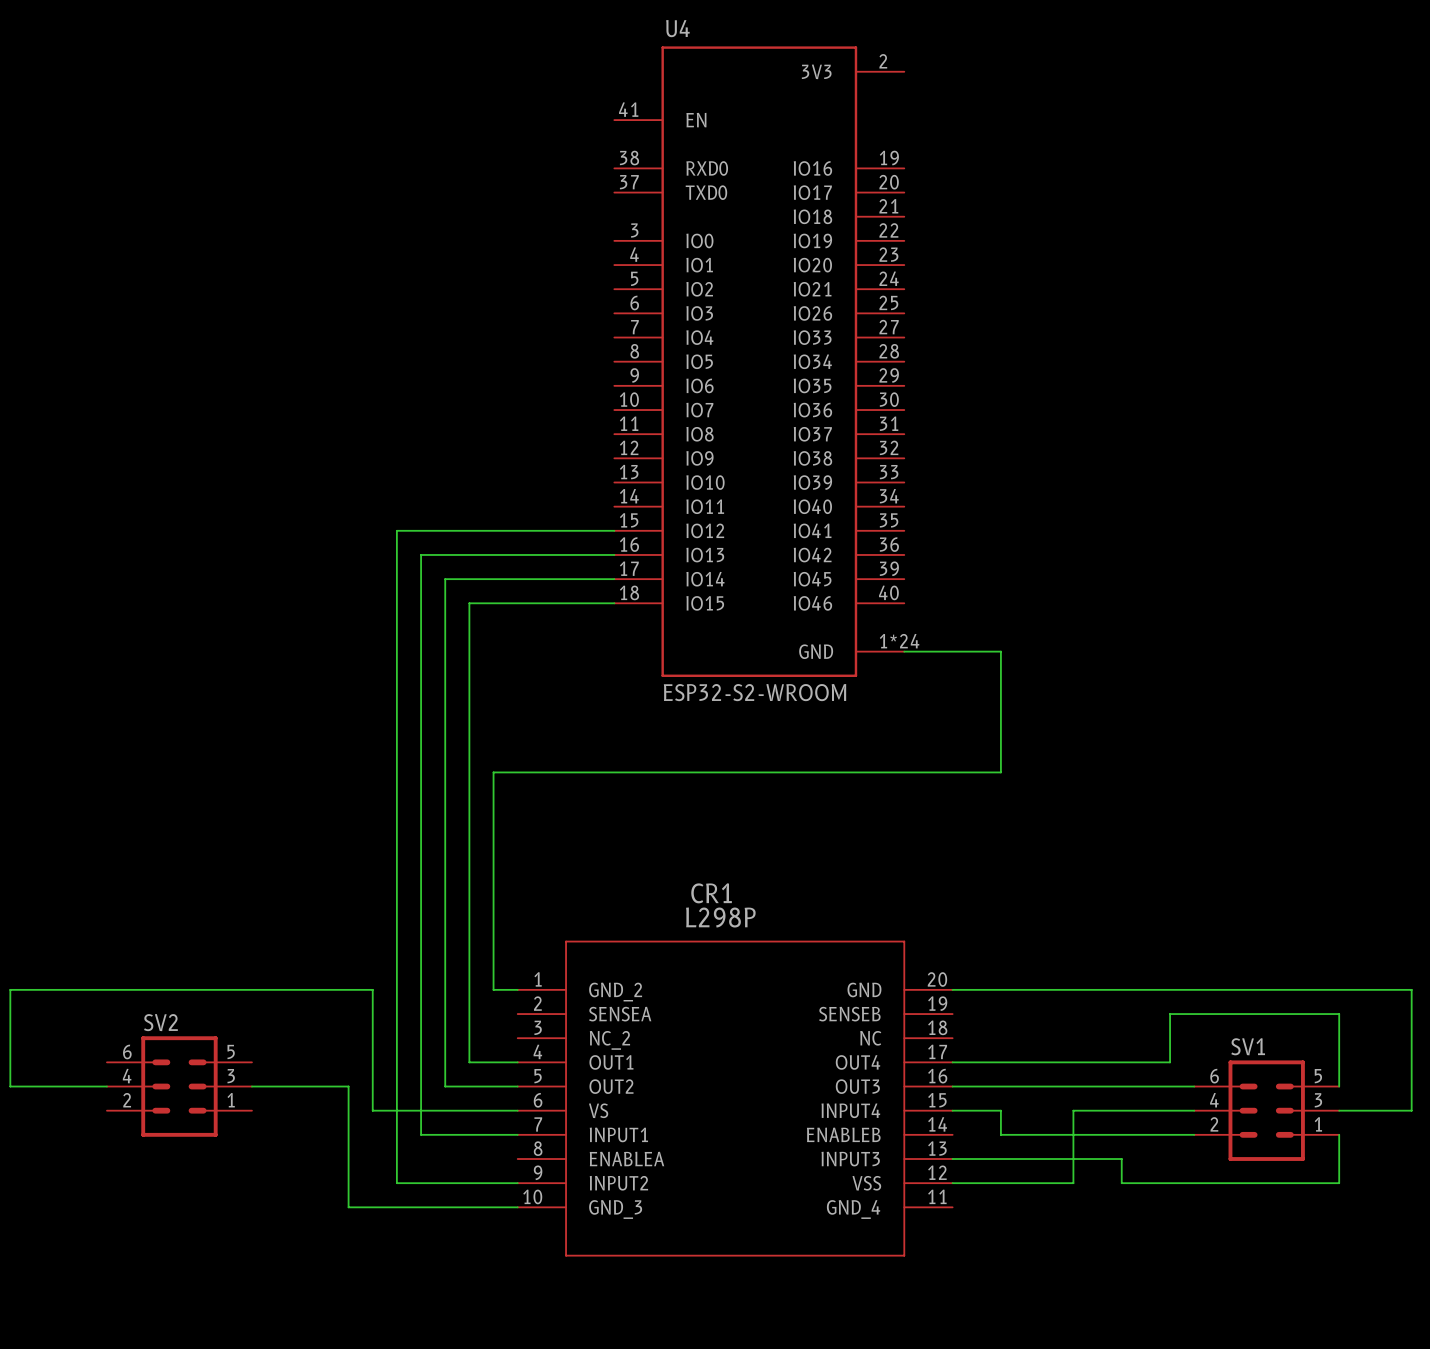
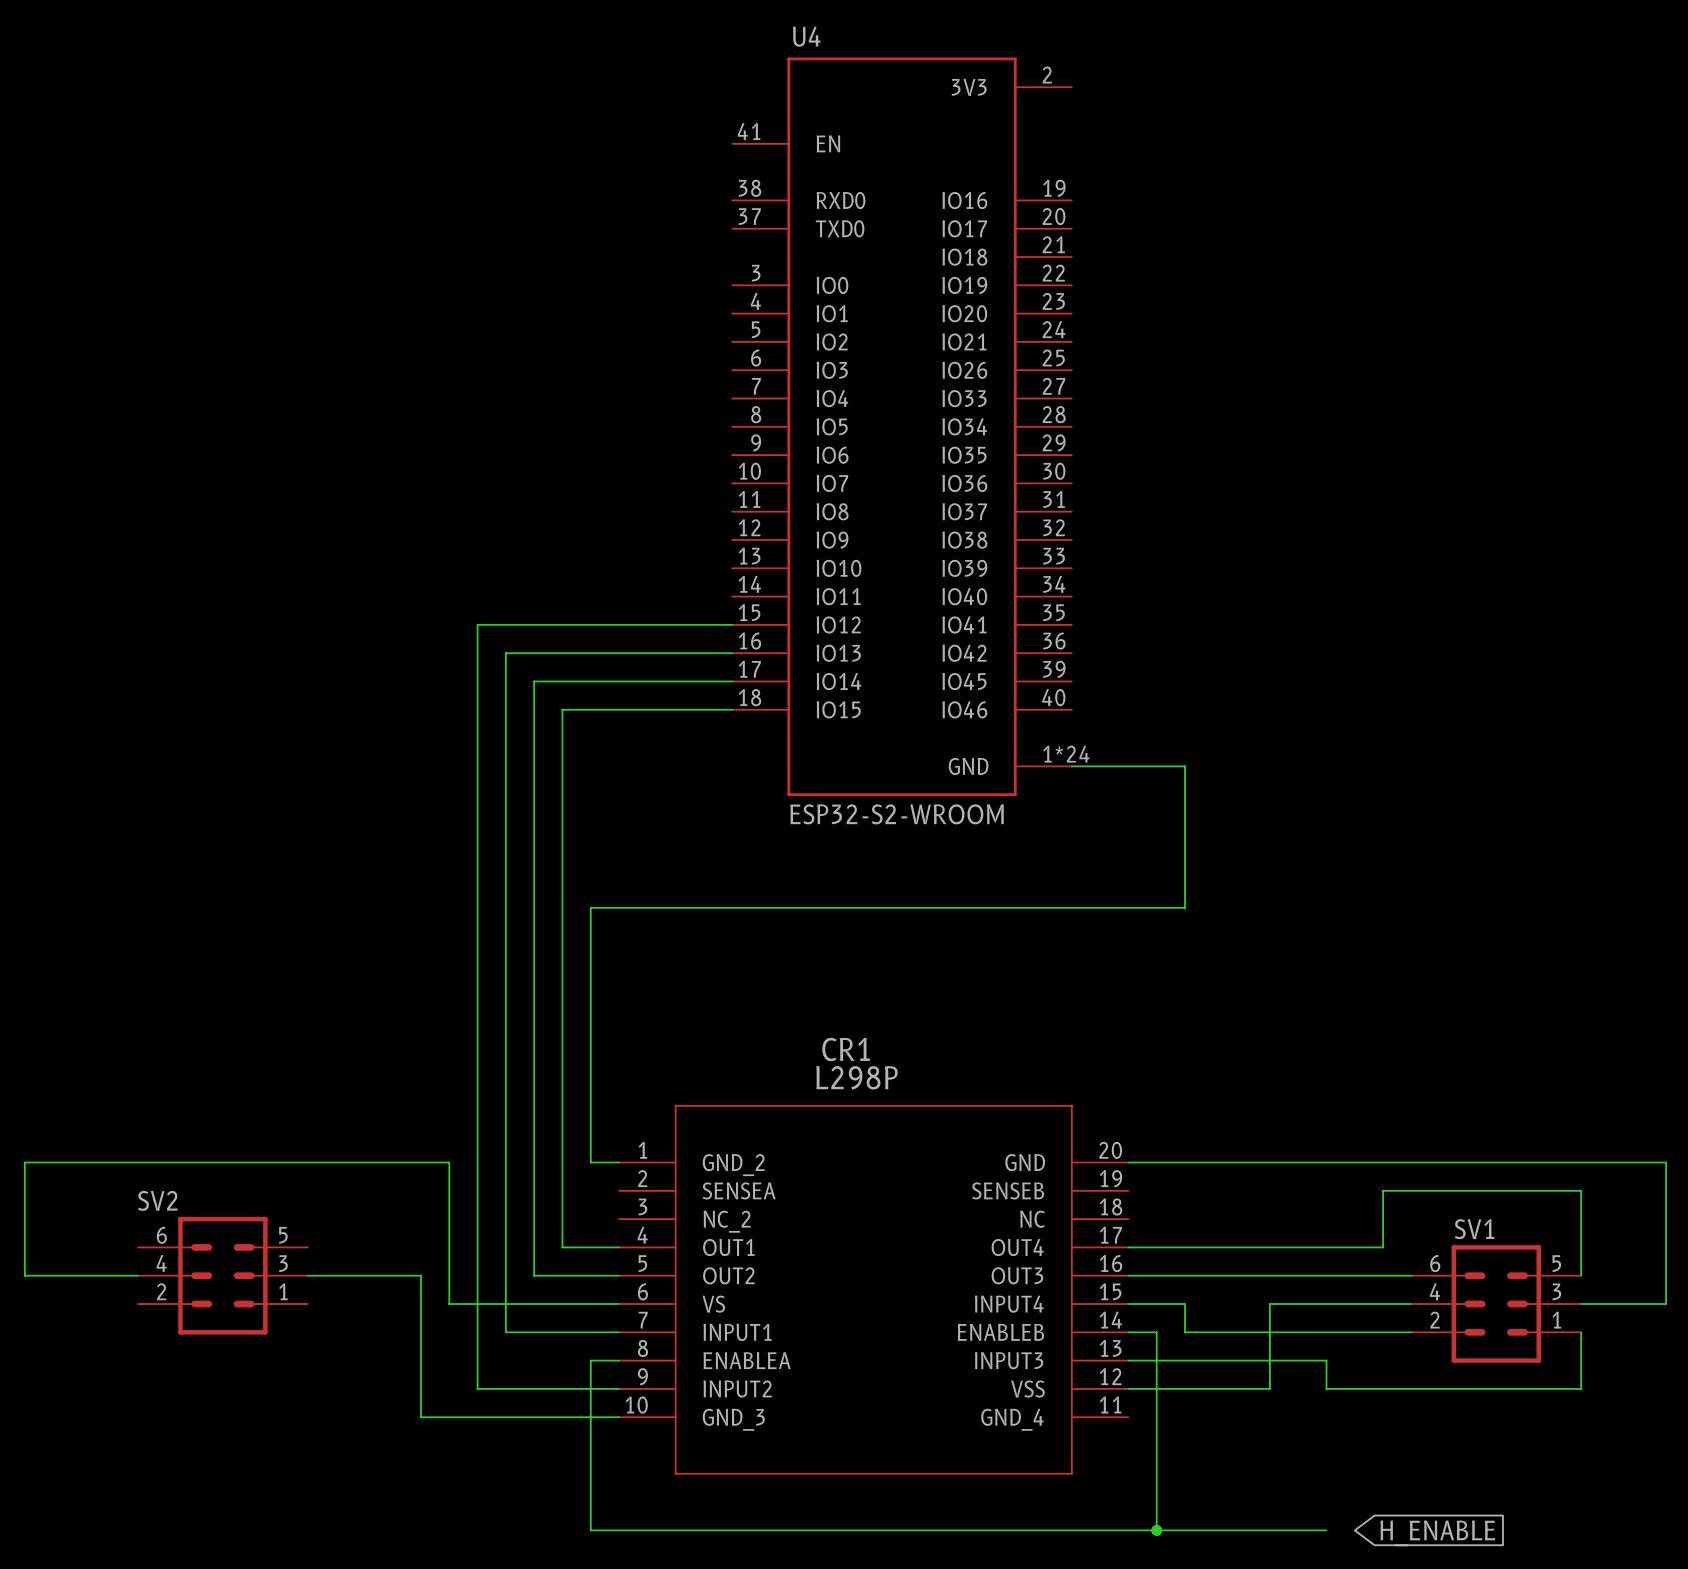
SV2 name position: SV2 (160, 1022) -> SV2 (157, 1200)
wire: none -> (1128, 1332) (1156, 1332) (1156, 1530)
wire: none -> (619, 1360) (590, 1360) (590, 1530) (1326, 1530)
junction: none -> (1156, 1530)
global label: none -> H_ENABLE (1437, 1533)

